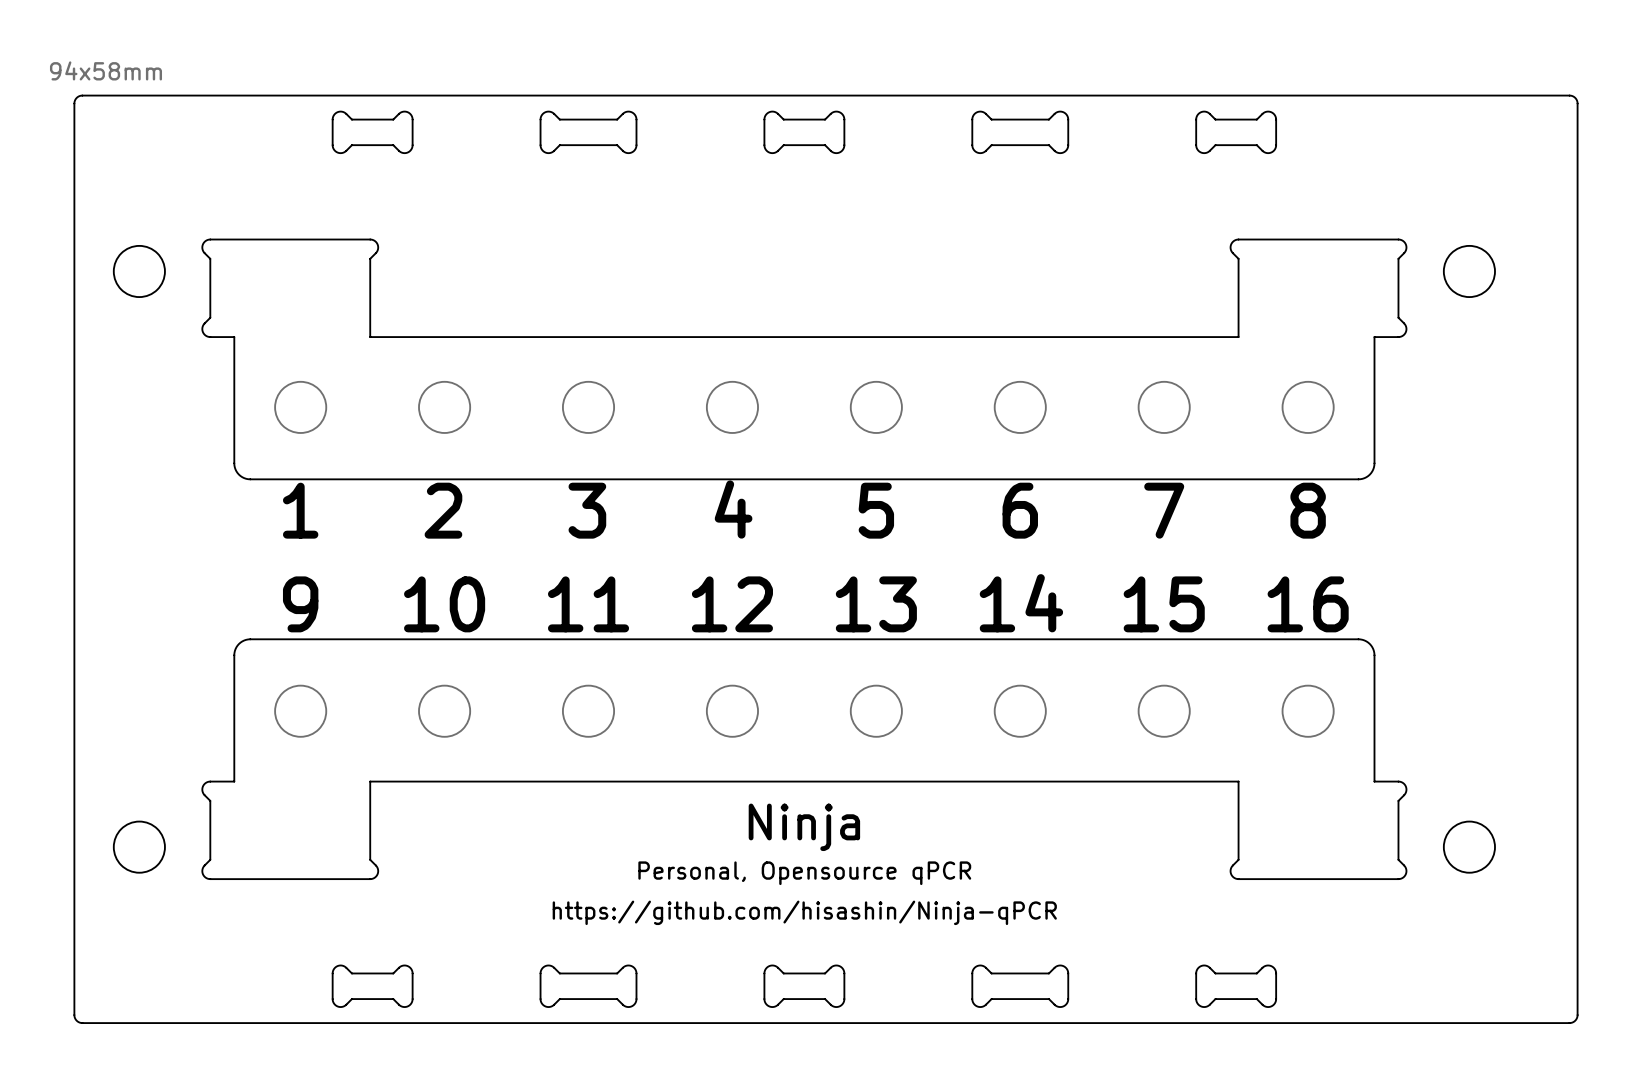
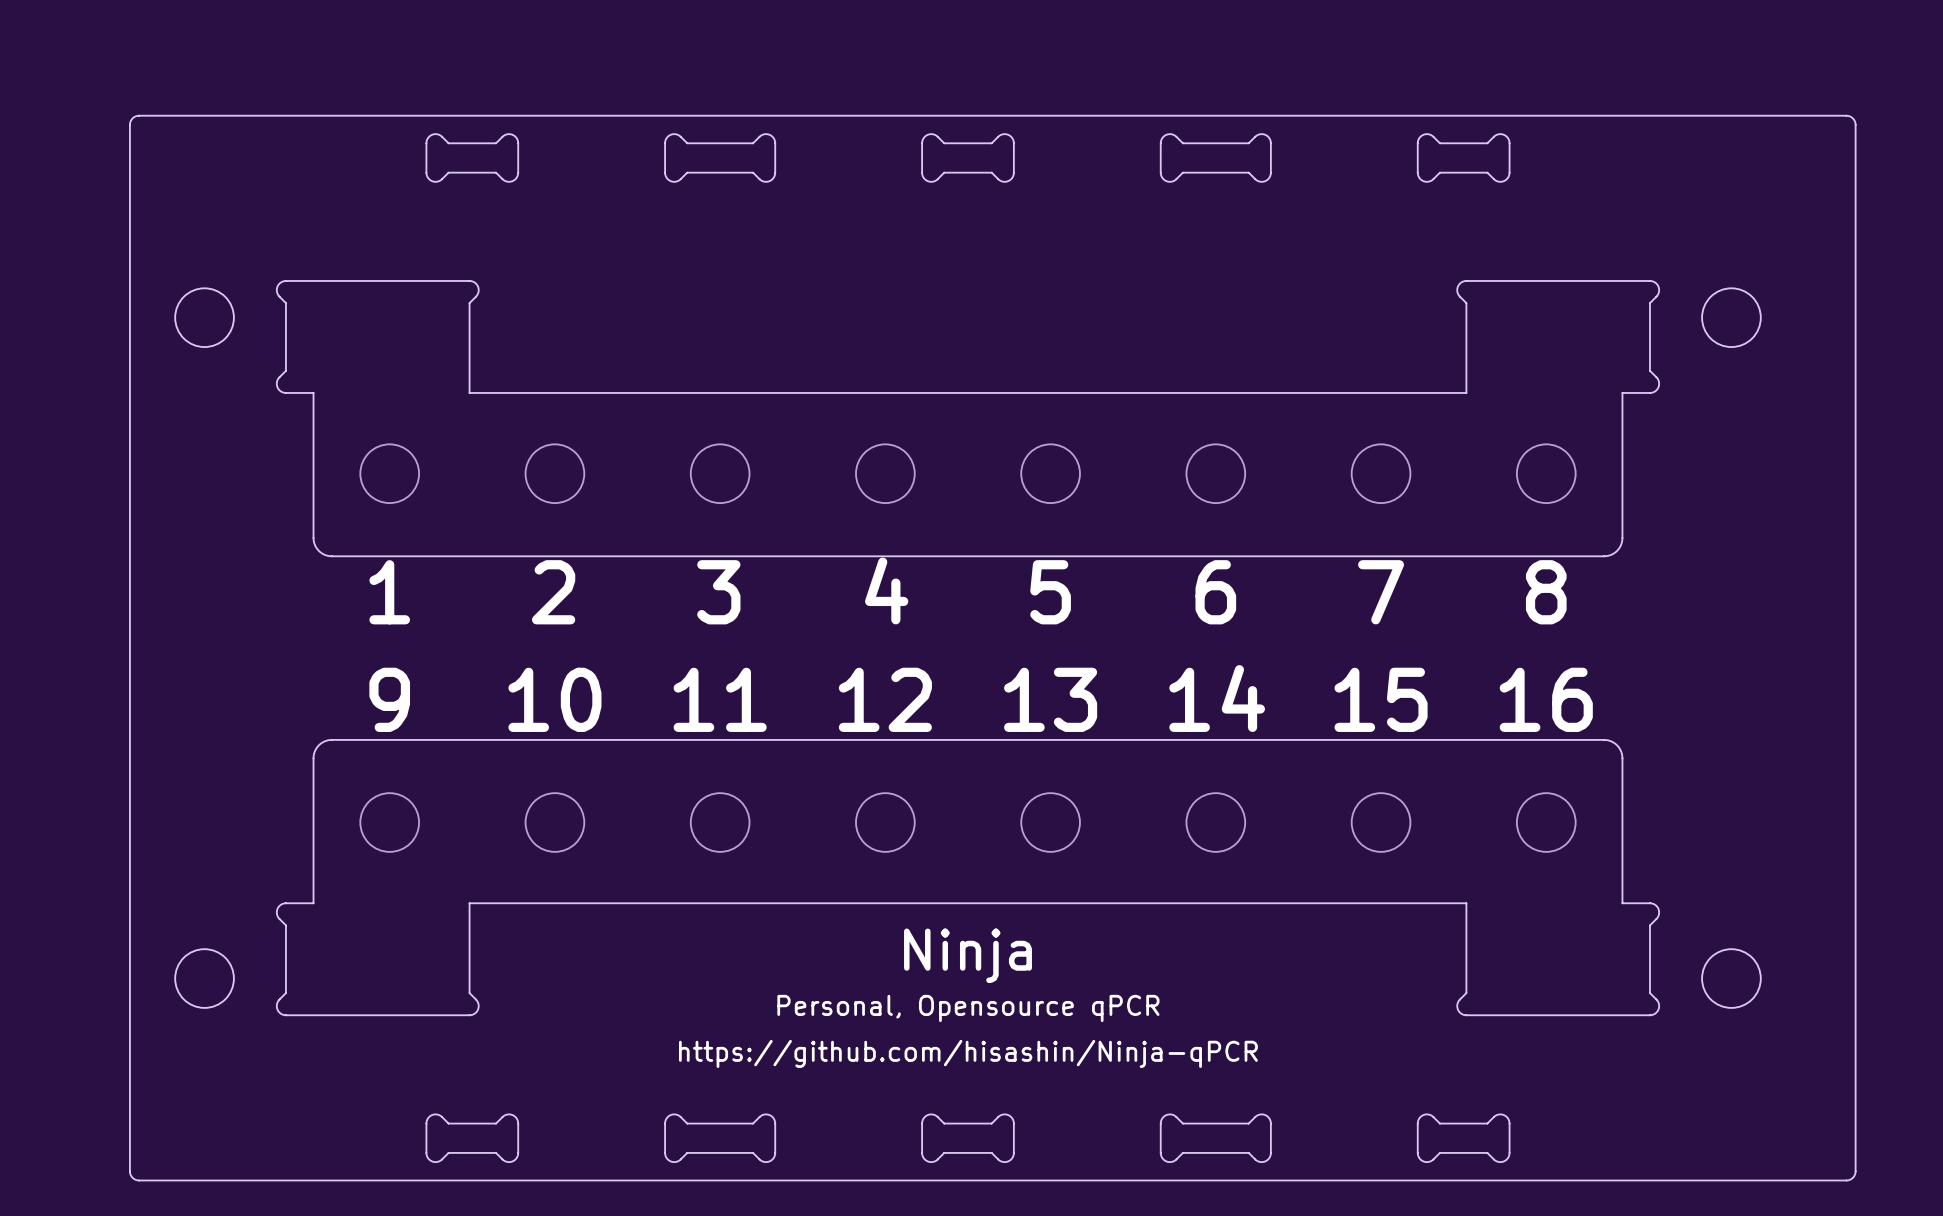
text: 94x58mm (105, 70) -> none

